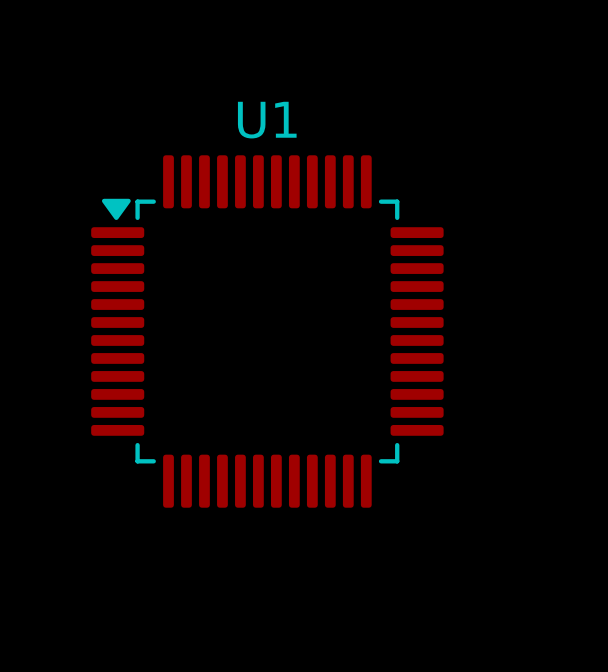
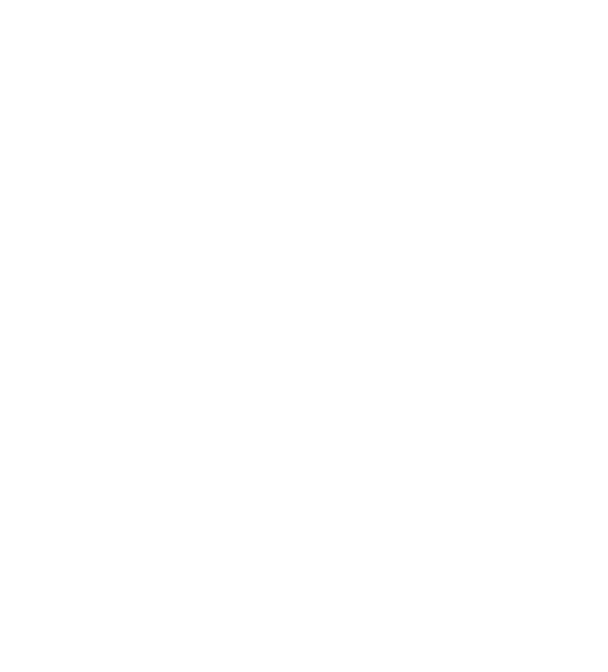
U1: (267, 331) -> none

